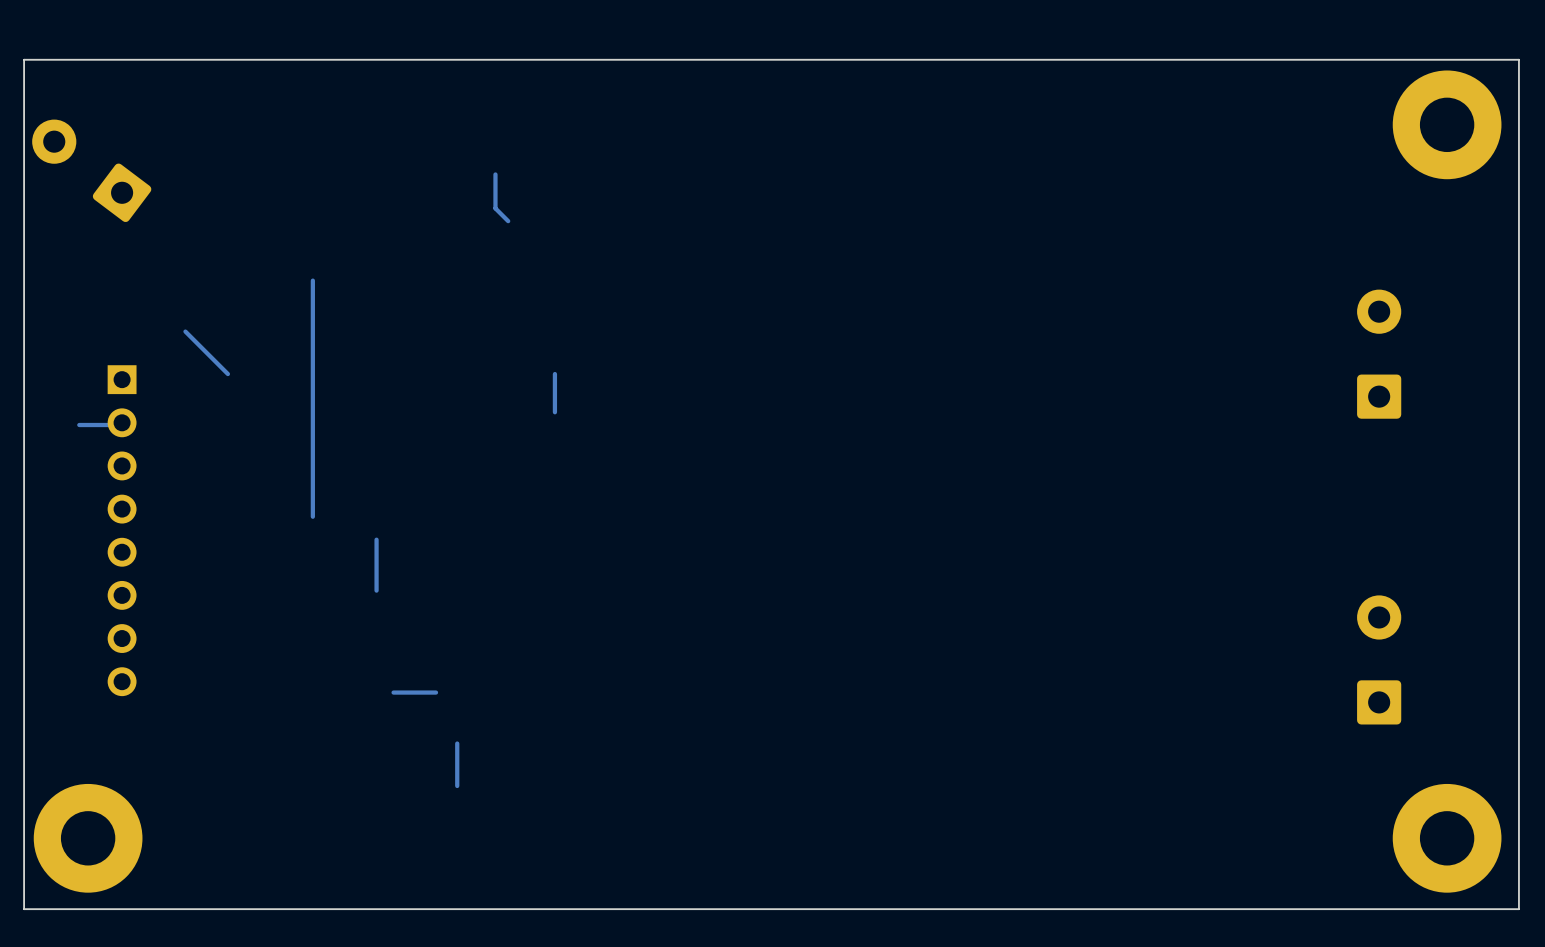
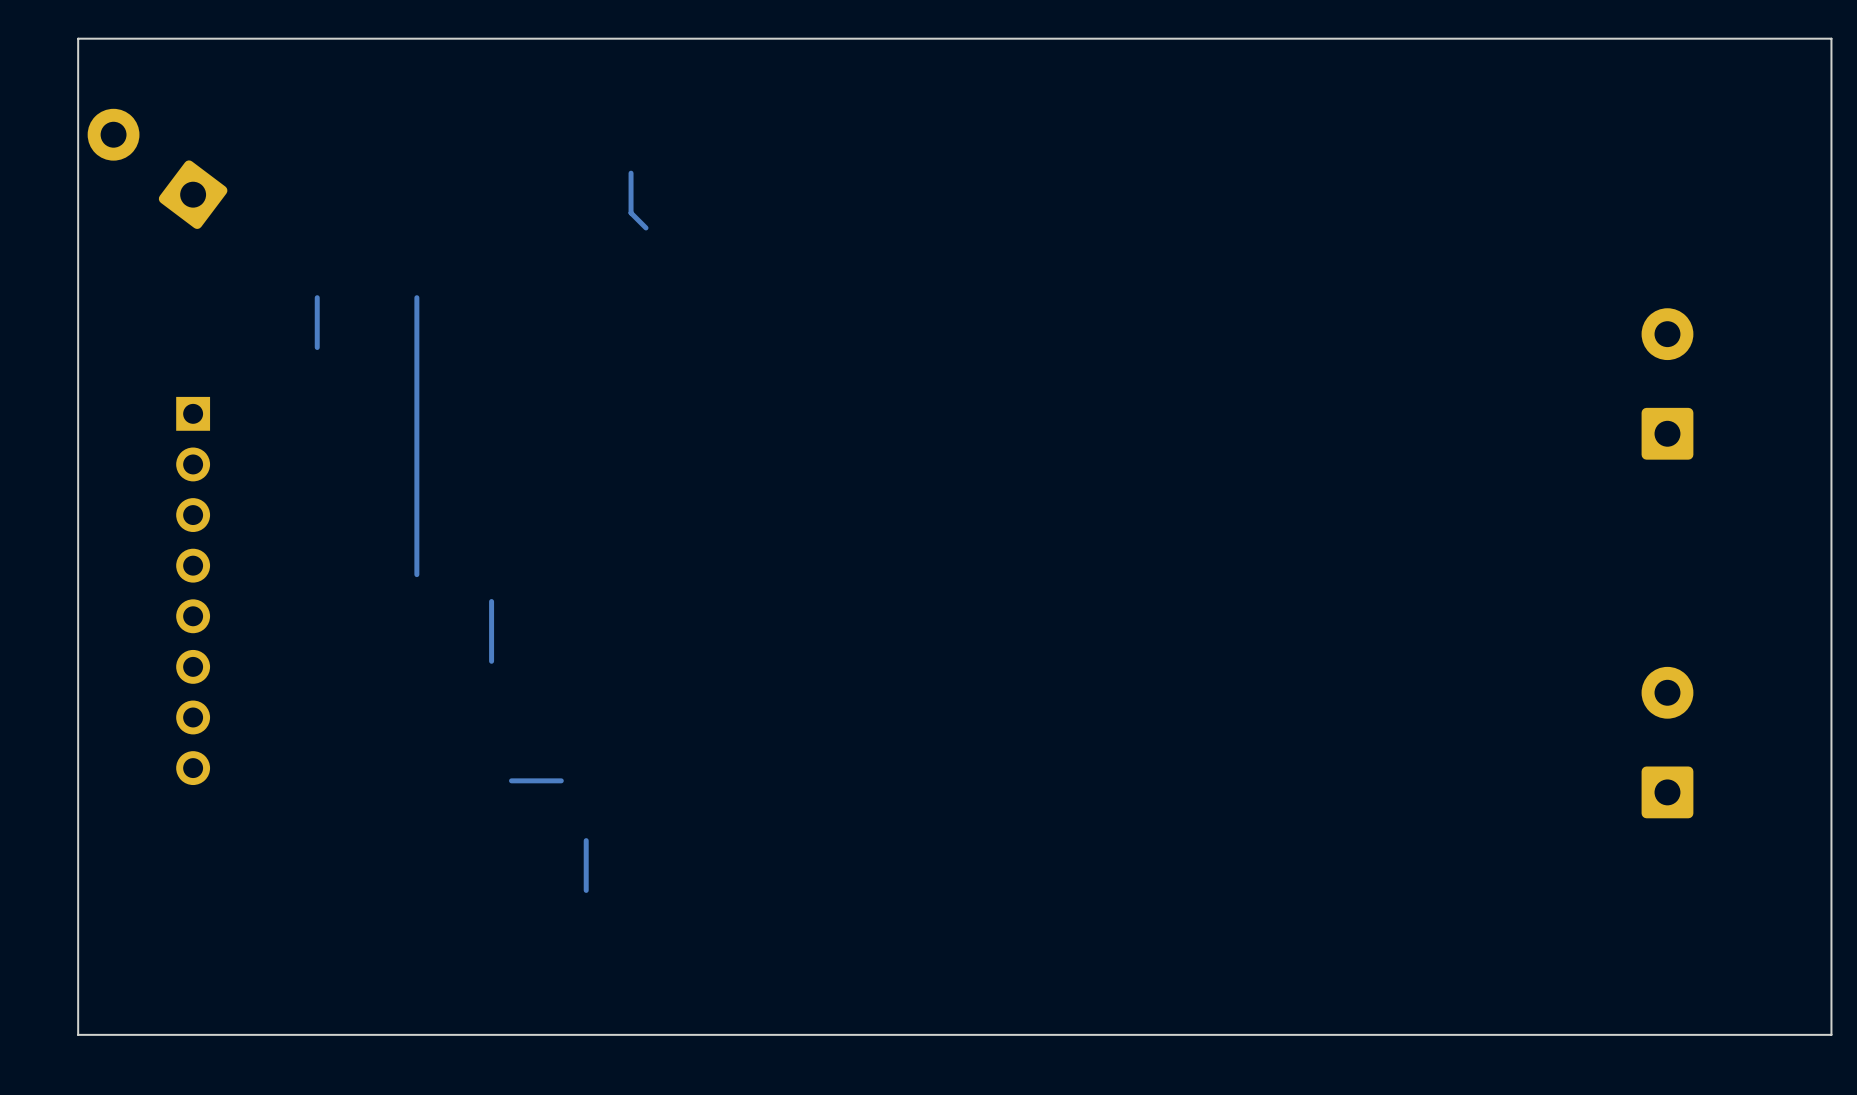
part: (1447, 124) -> none
track: none -> (317, 297) (317, 347)
track: (185, 331) (227, 374) -> none
track: (554, 374) (554, 412) -> none
track: (79, 425) (125, 425) -> none
part: (88, 838) -> none
part: (1447, 838) -> none

